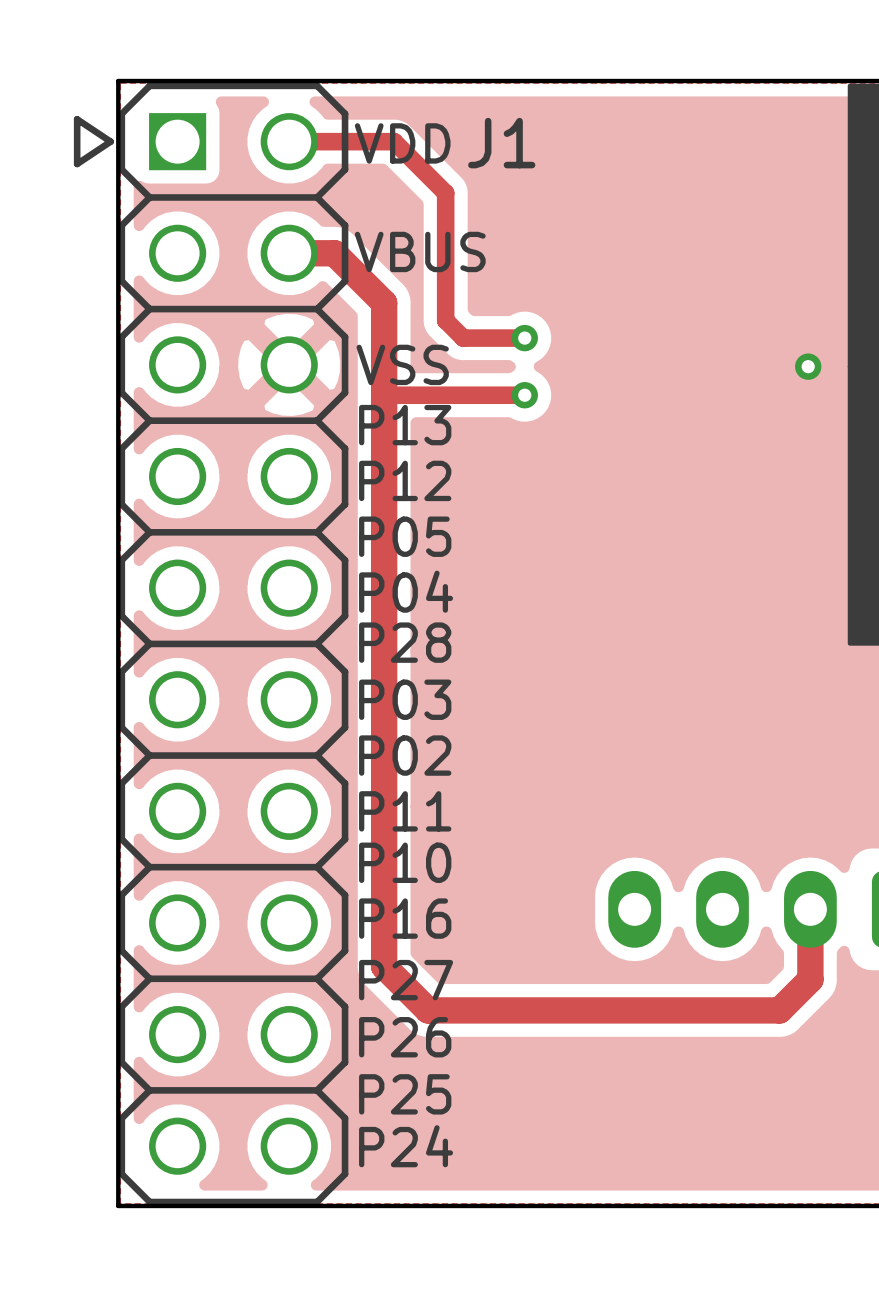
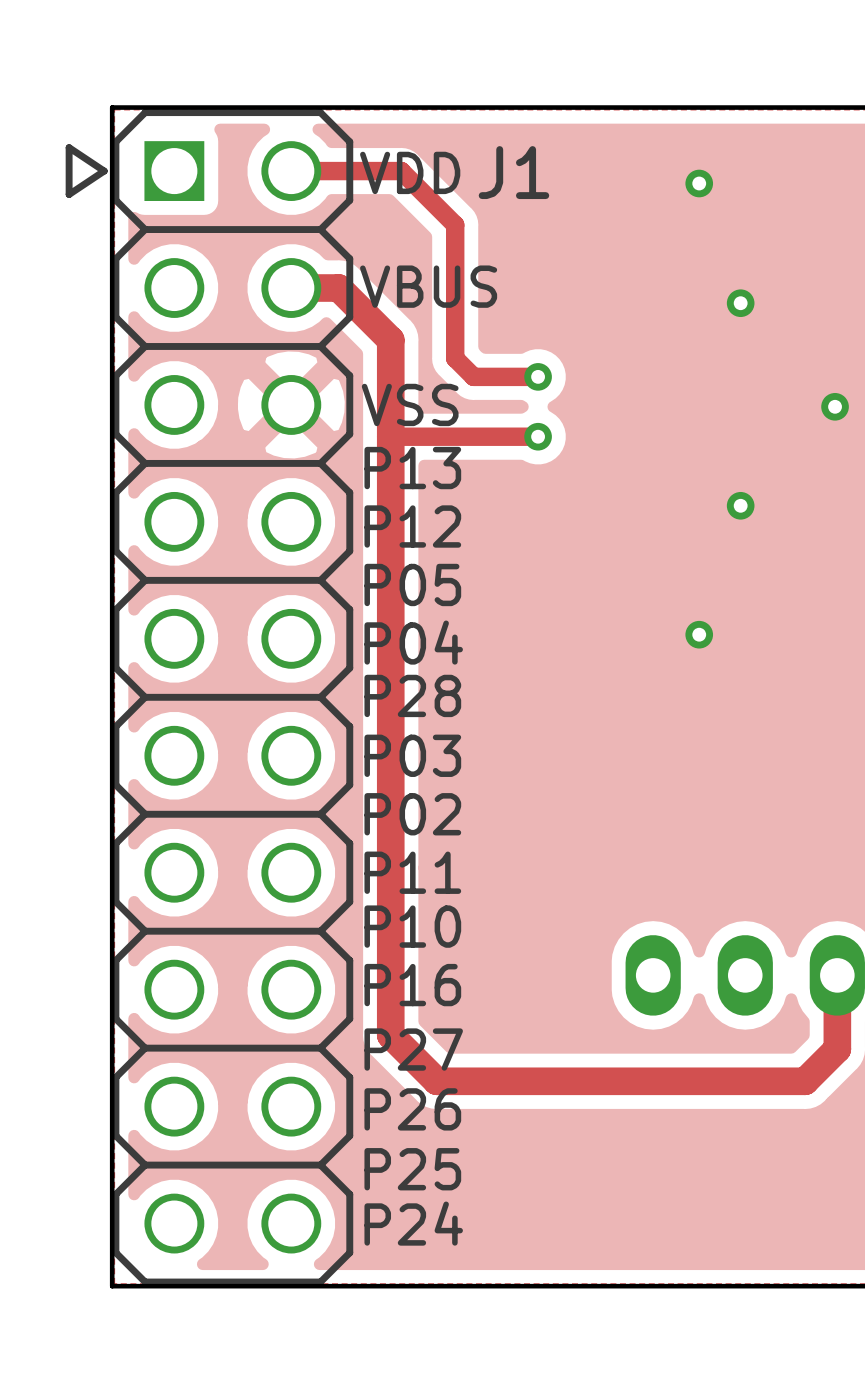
via: none -> (699, 183)
via: none -> (740, 303)
via: none -> (740, 505)
via: none -> (699, 634)

